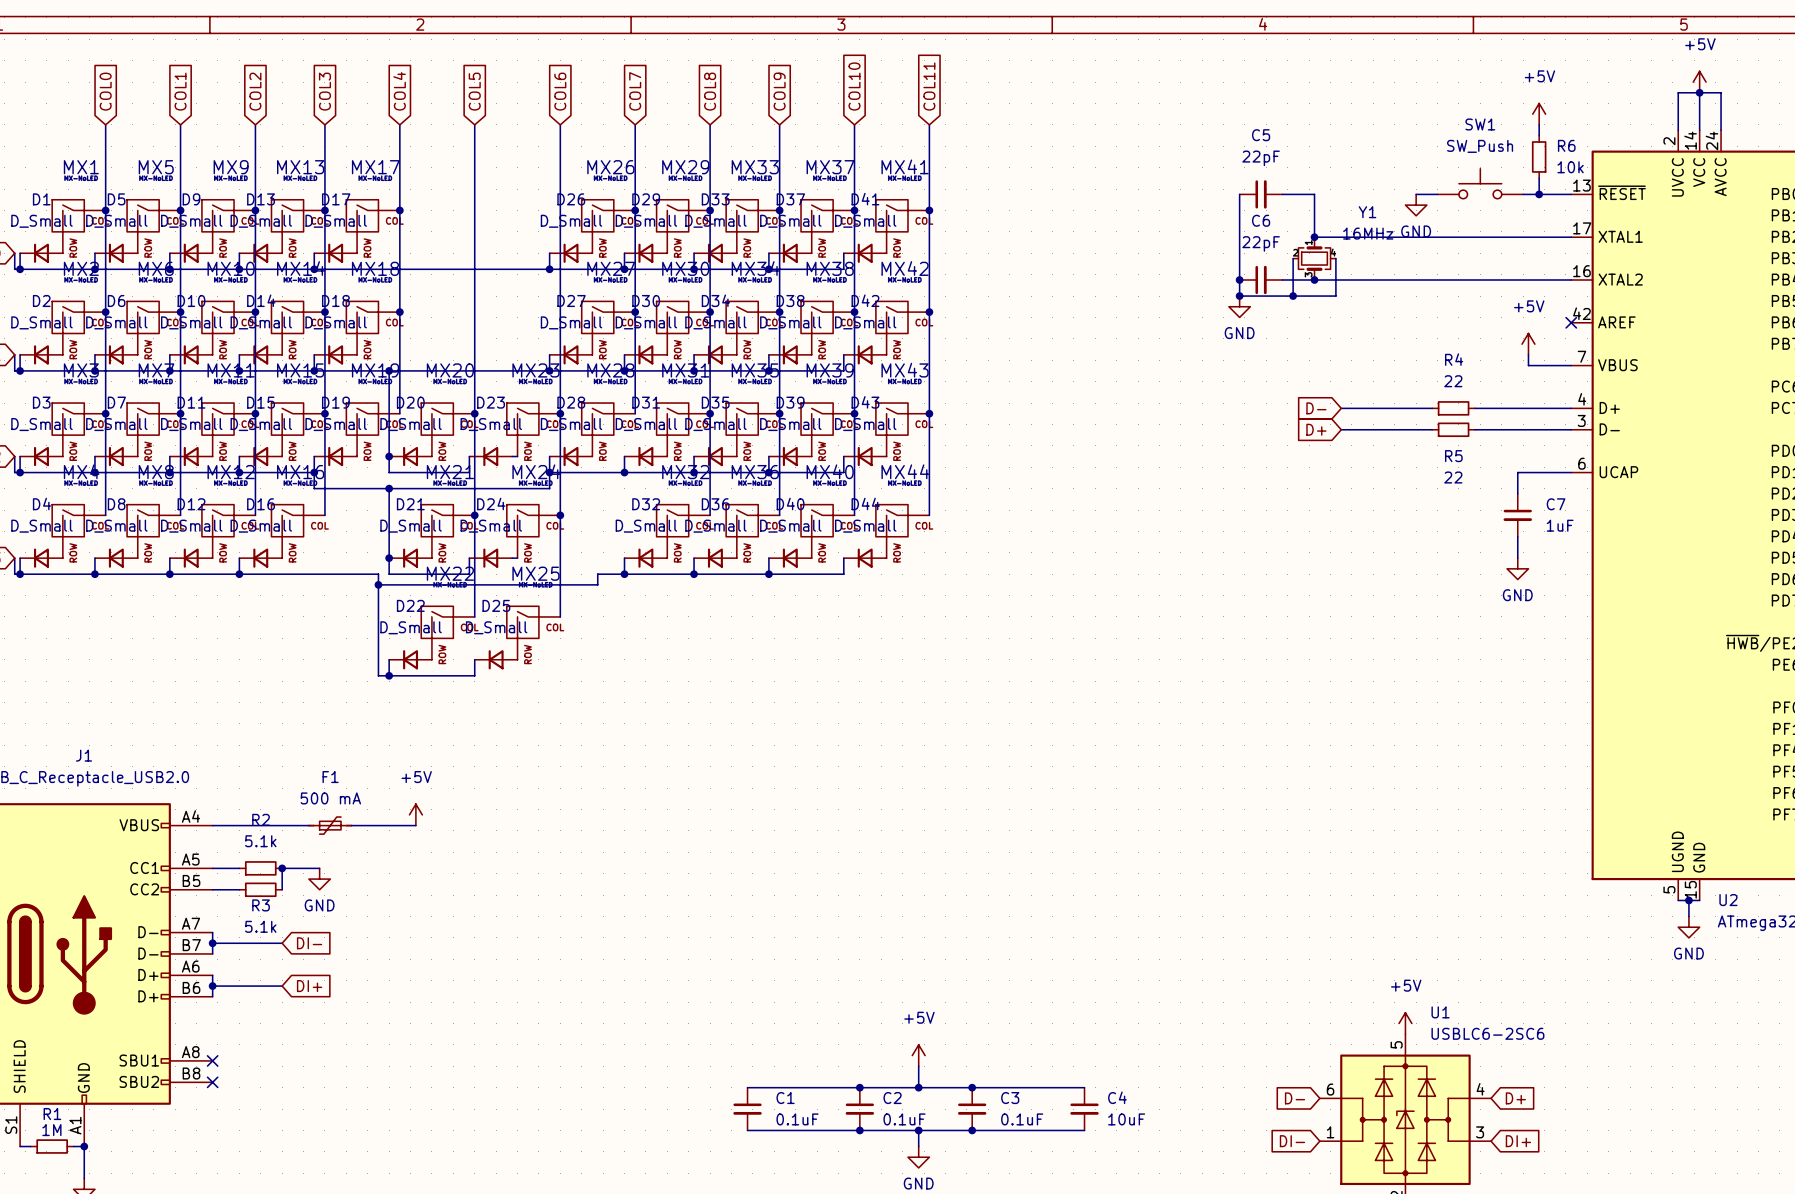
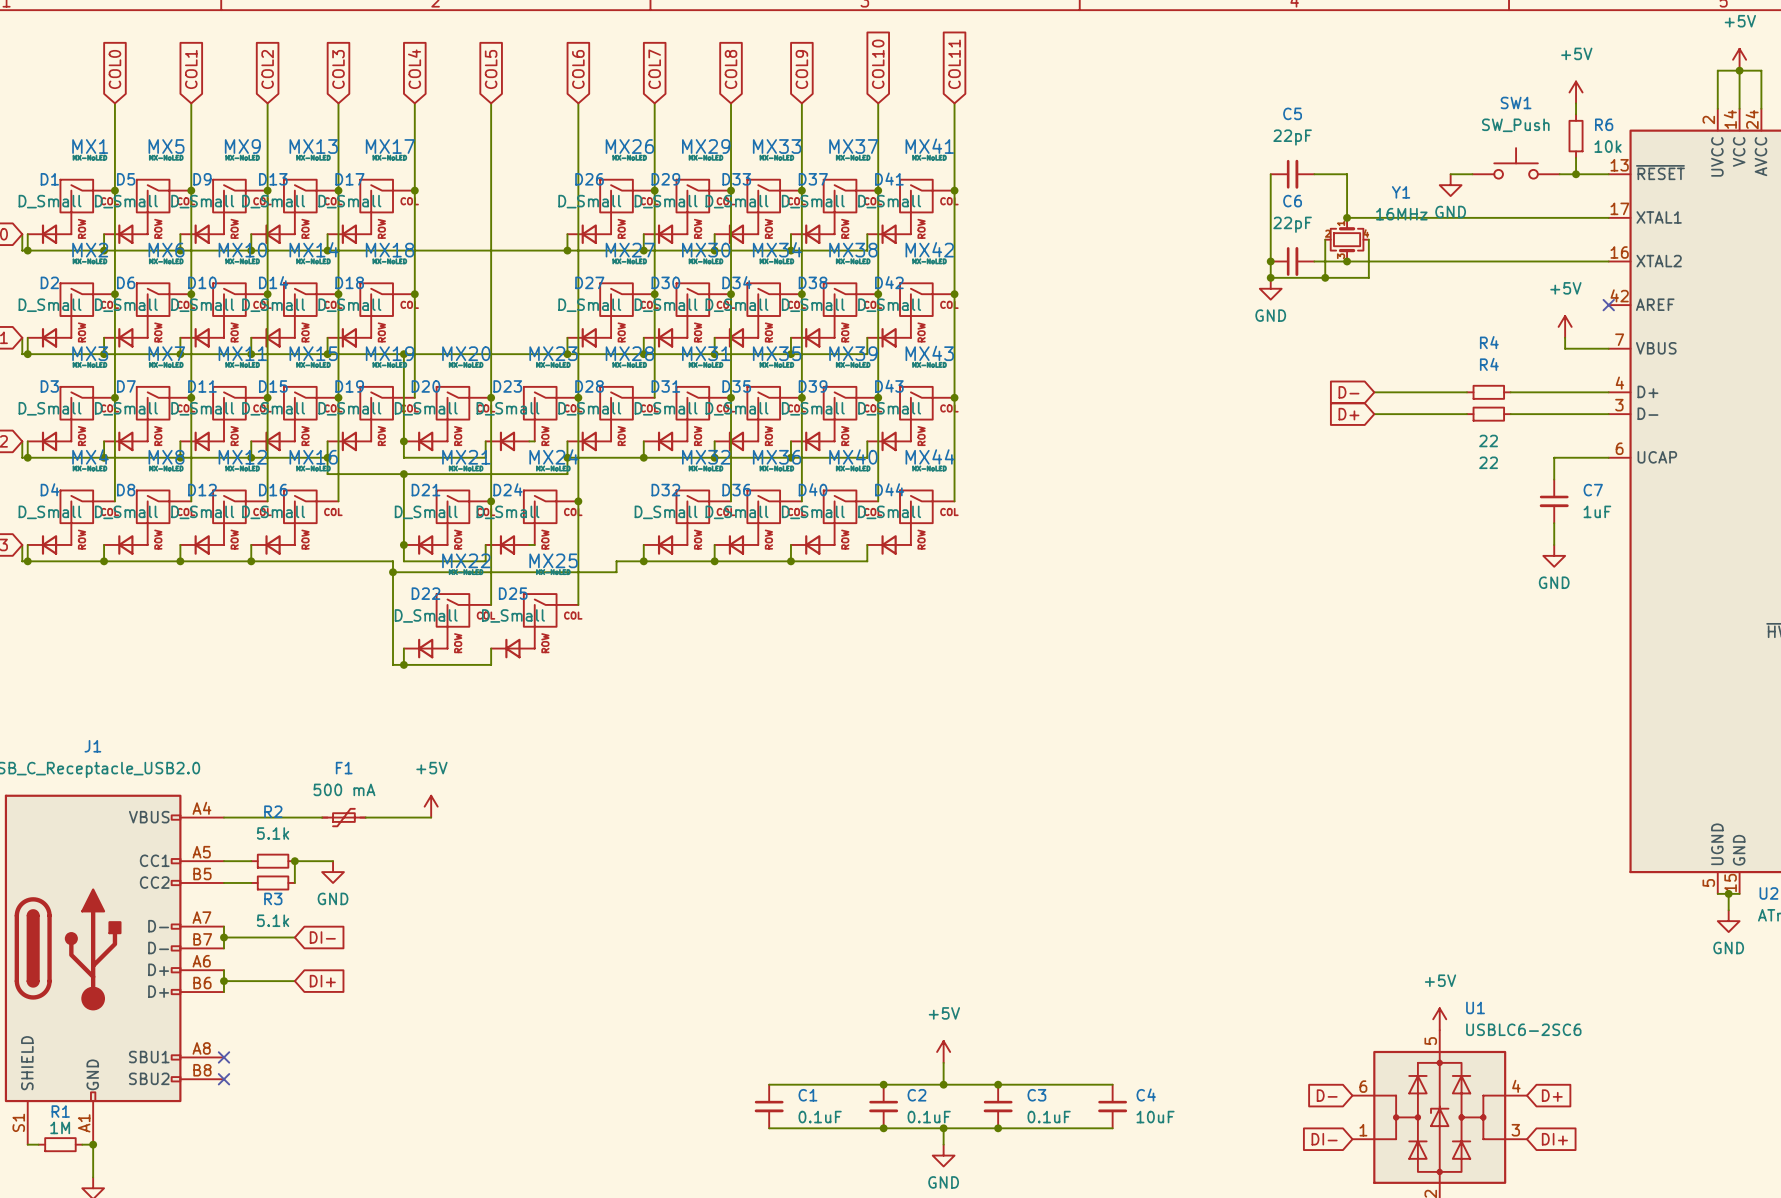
R4 value position: 22 (1453, 381) -> 22 (1488, 440)
R5 name: R5 (1453, 456) -> R4 (1489, 364)

